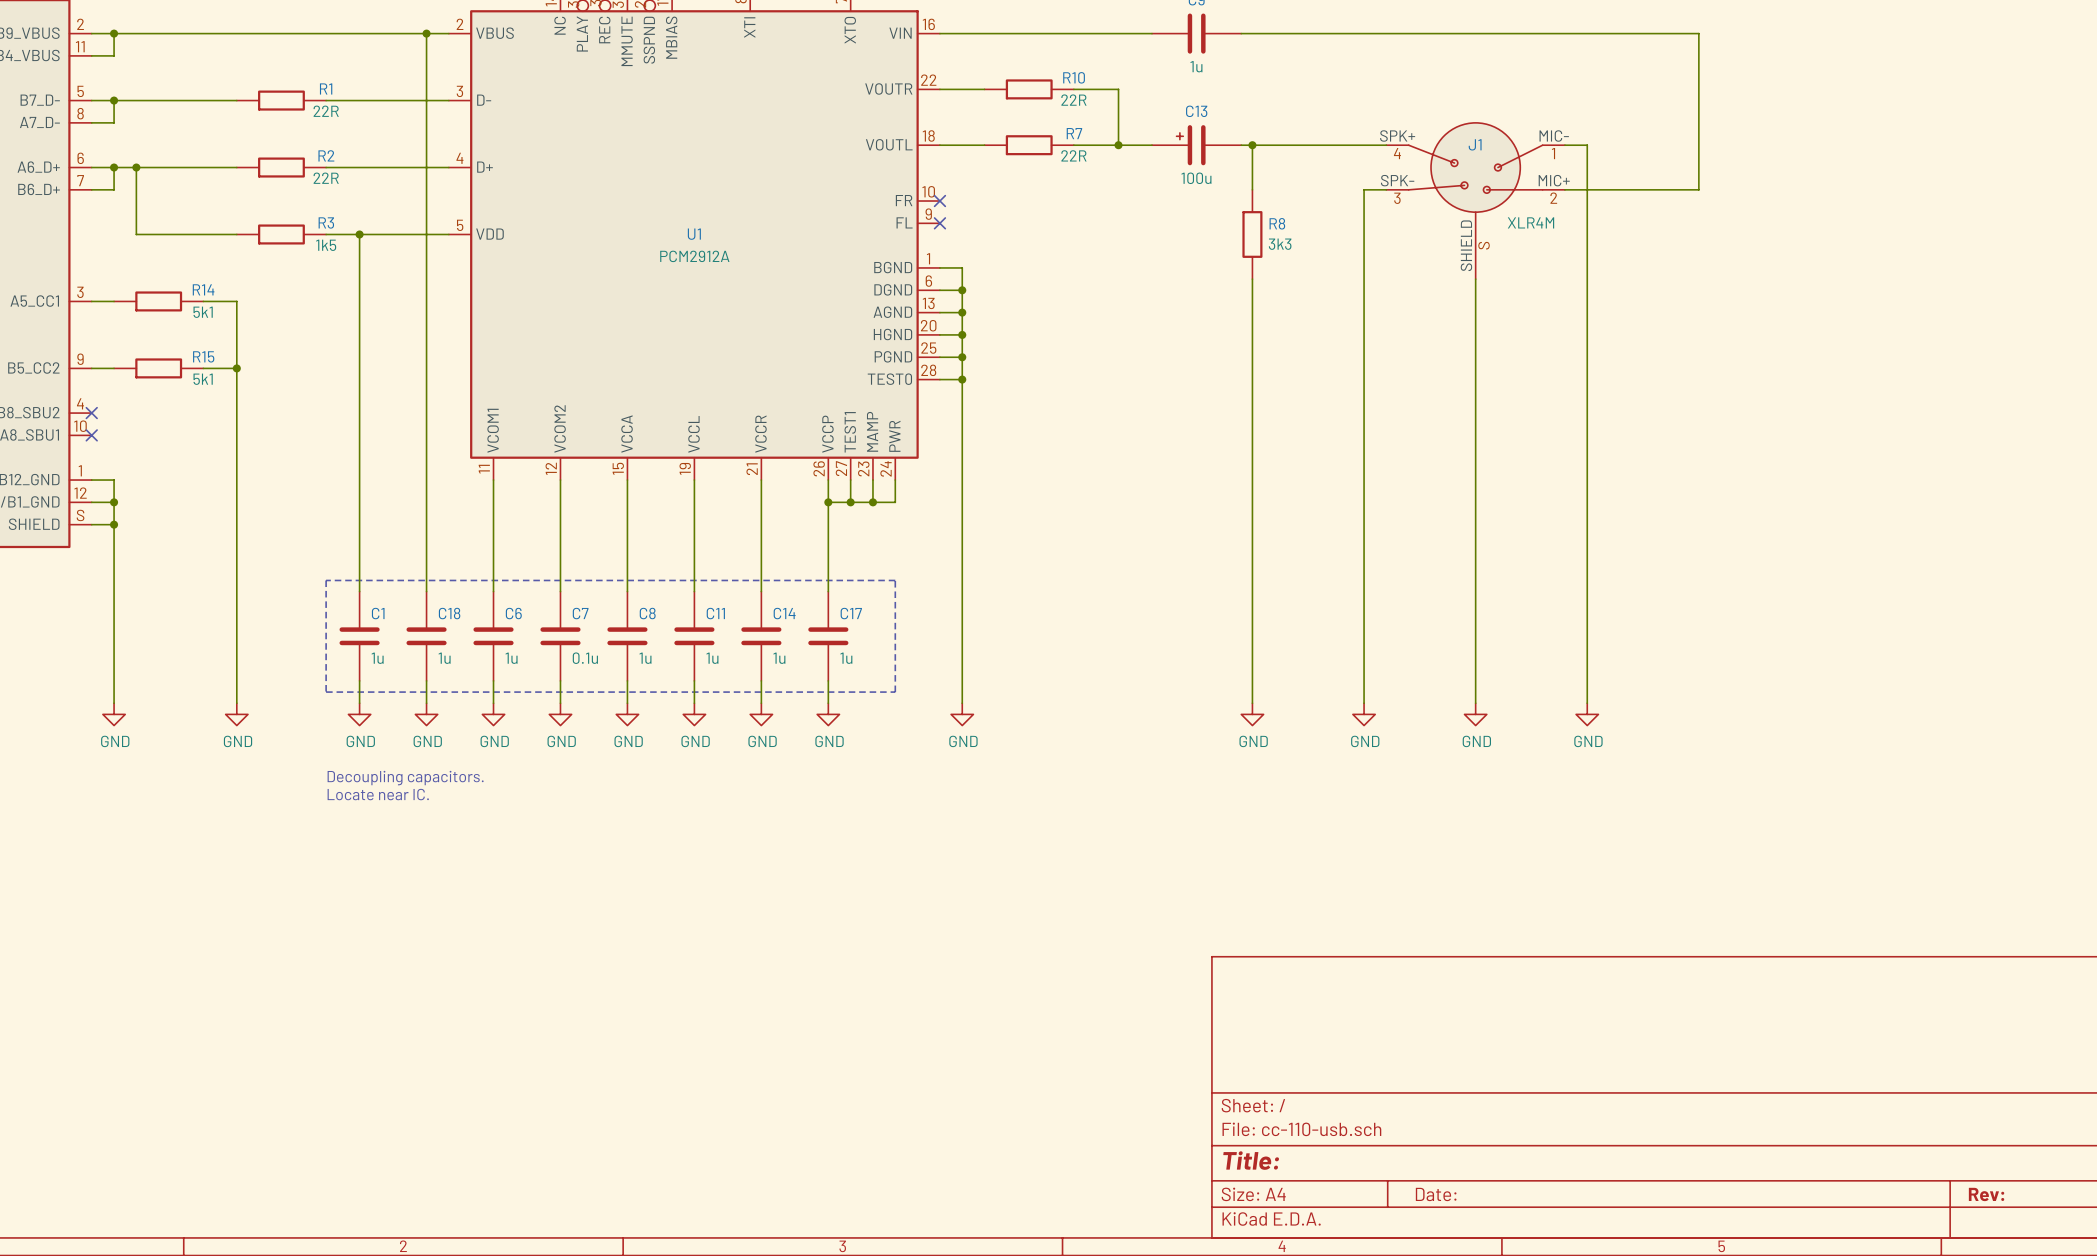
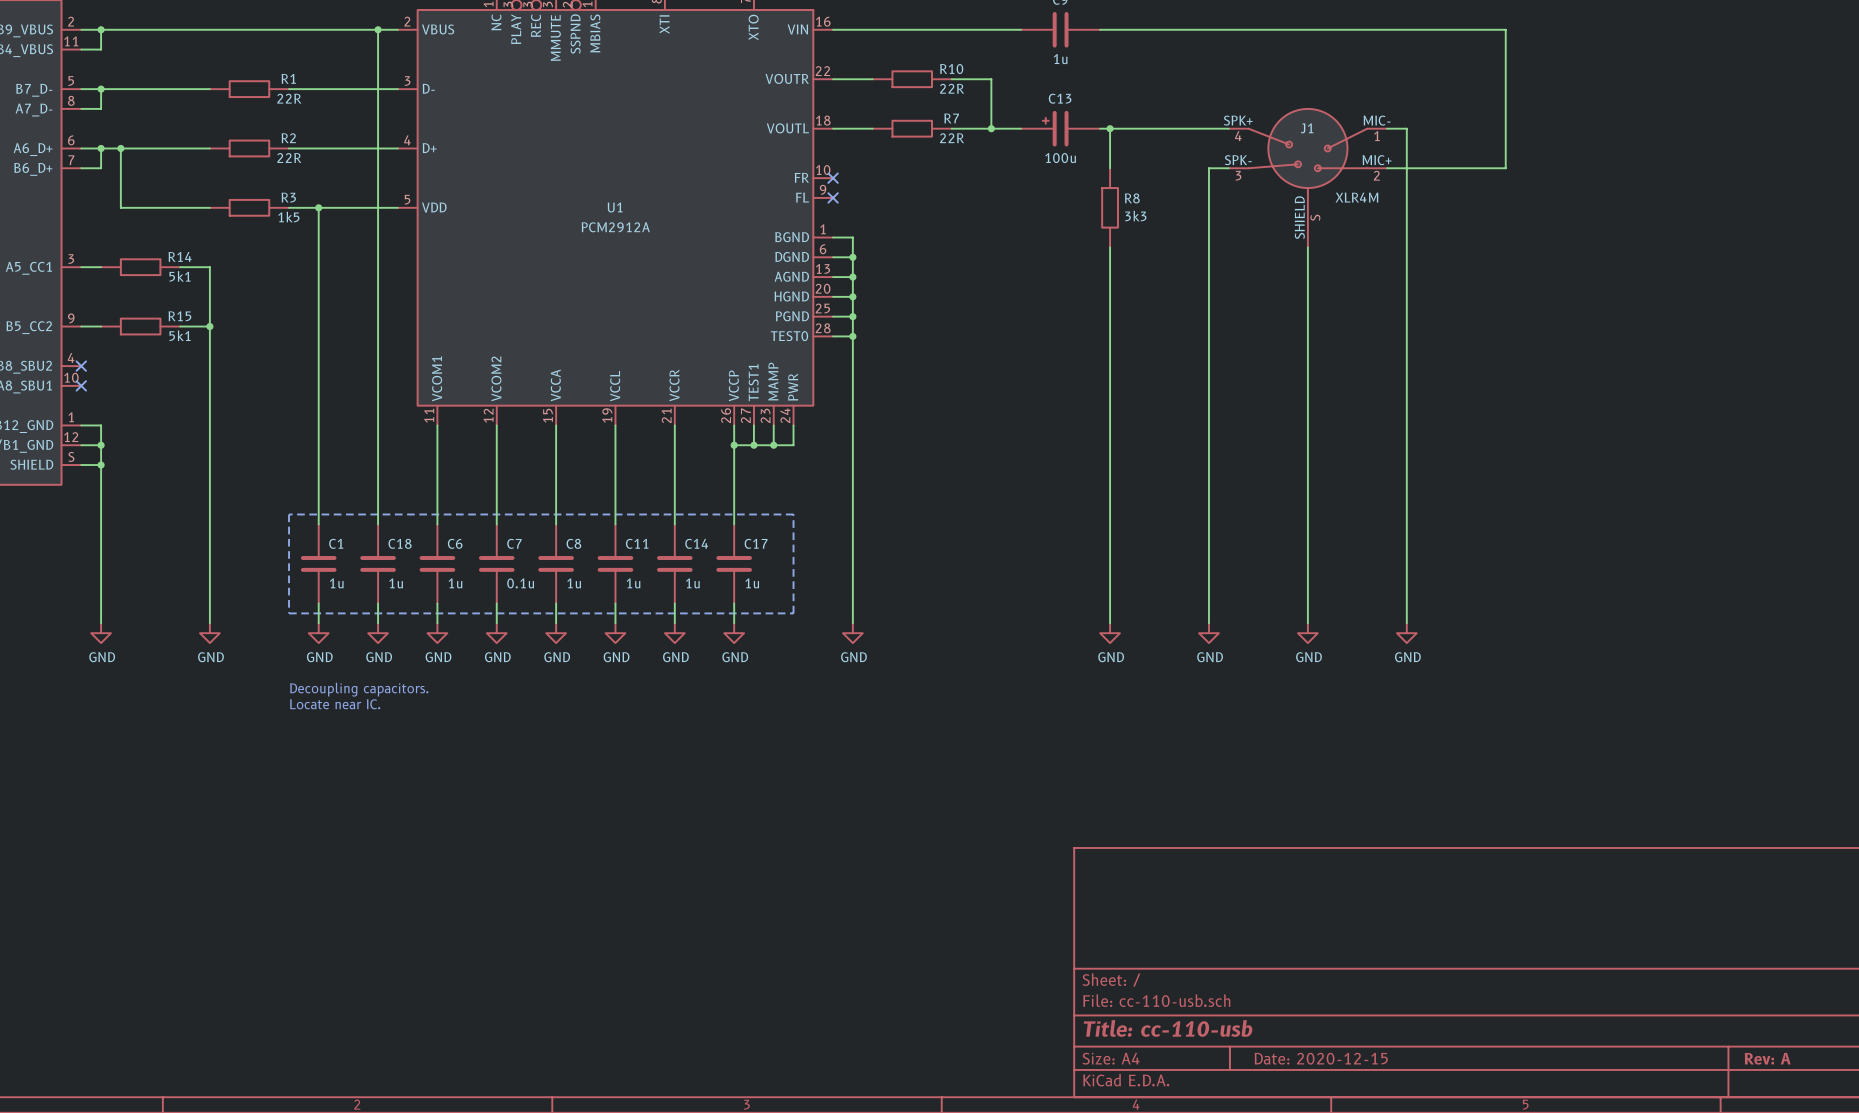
title block: Title: (1251, 1160) -> Title: cc-110-usb (1168, 1028)
title block: Date: (1436, 1194) -> Date: 2020-12-15 (1321, 1058)
title block: Rev: (1986, 1194) -> Rev: A (1767, 1058)

